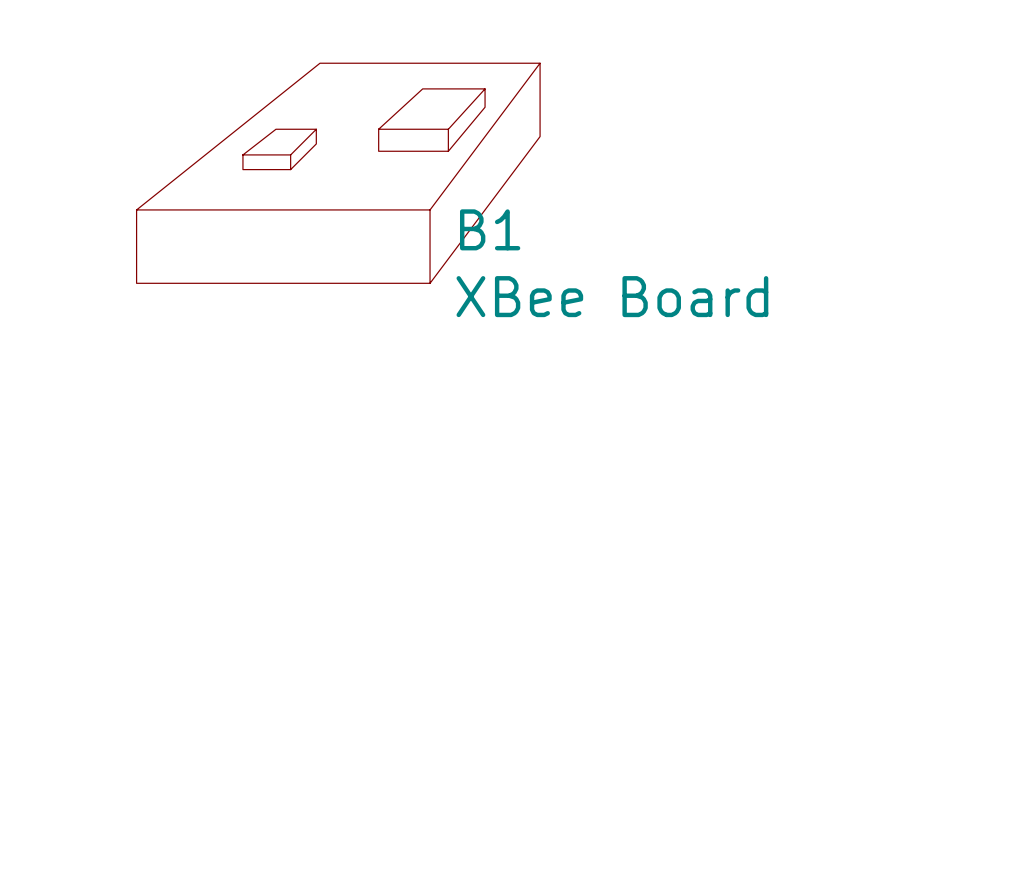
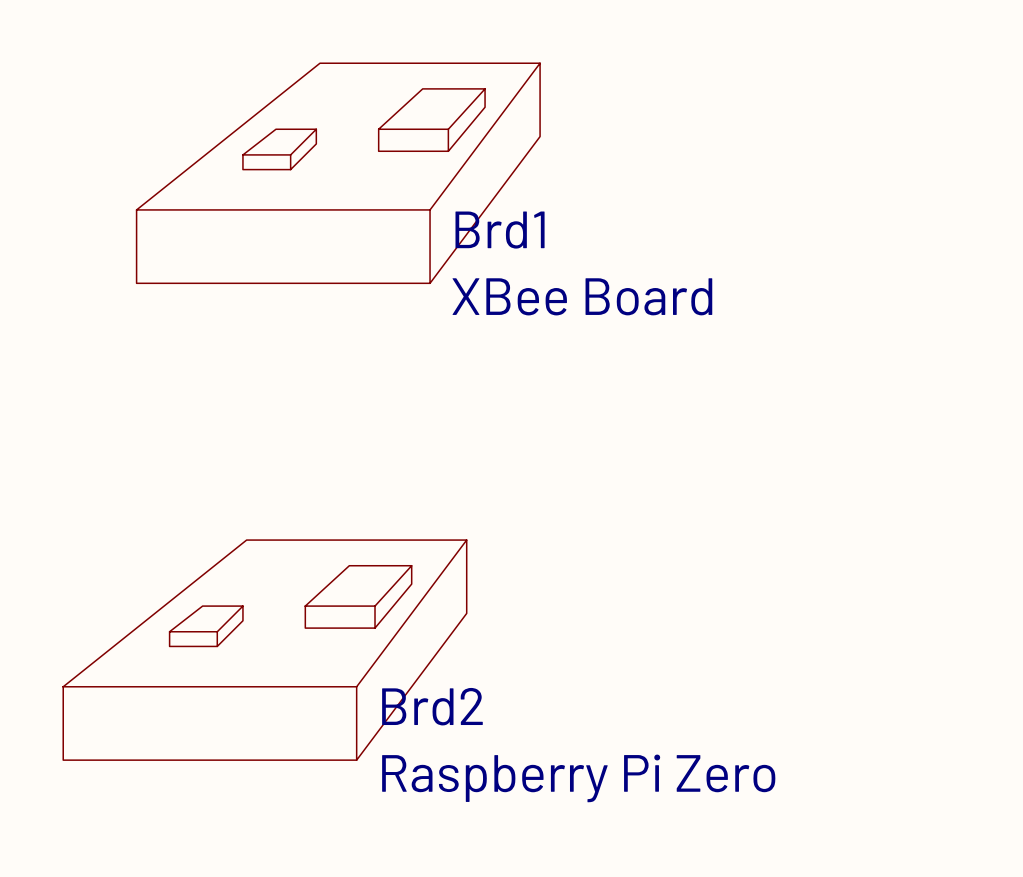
B1 name: B1 (490, 229) -> Brd1 (500, 230)
Brd2: none -> Raspberry Pi Zero (264, 650)

